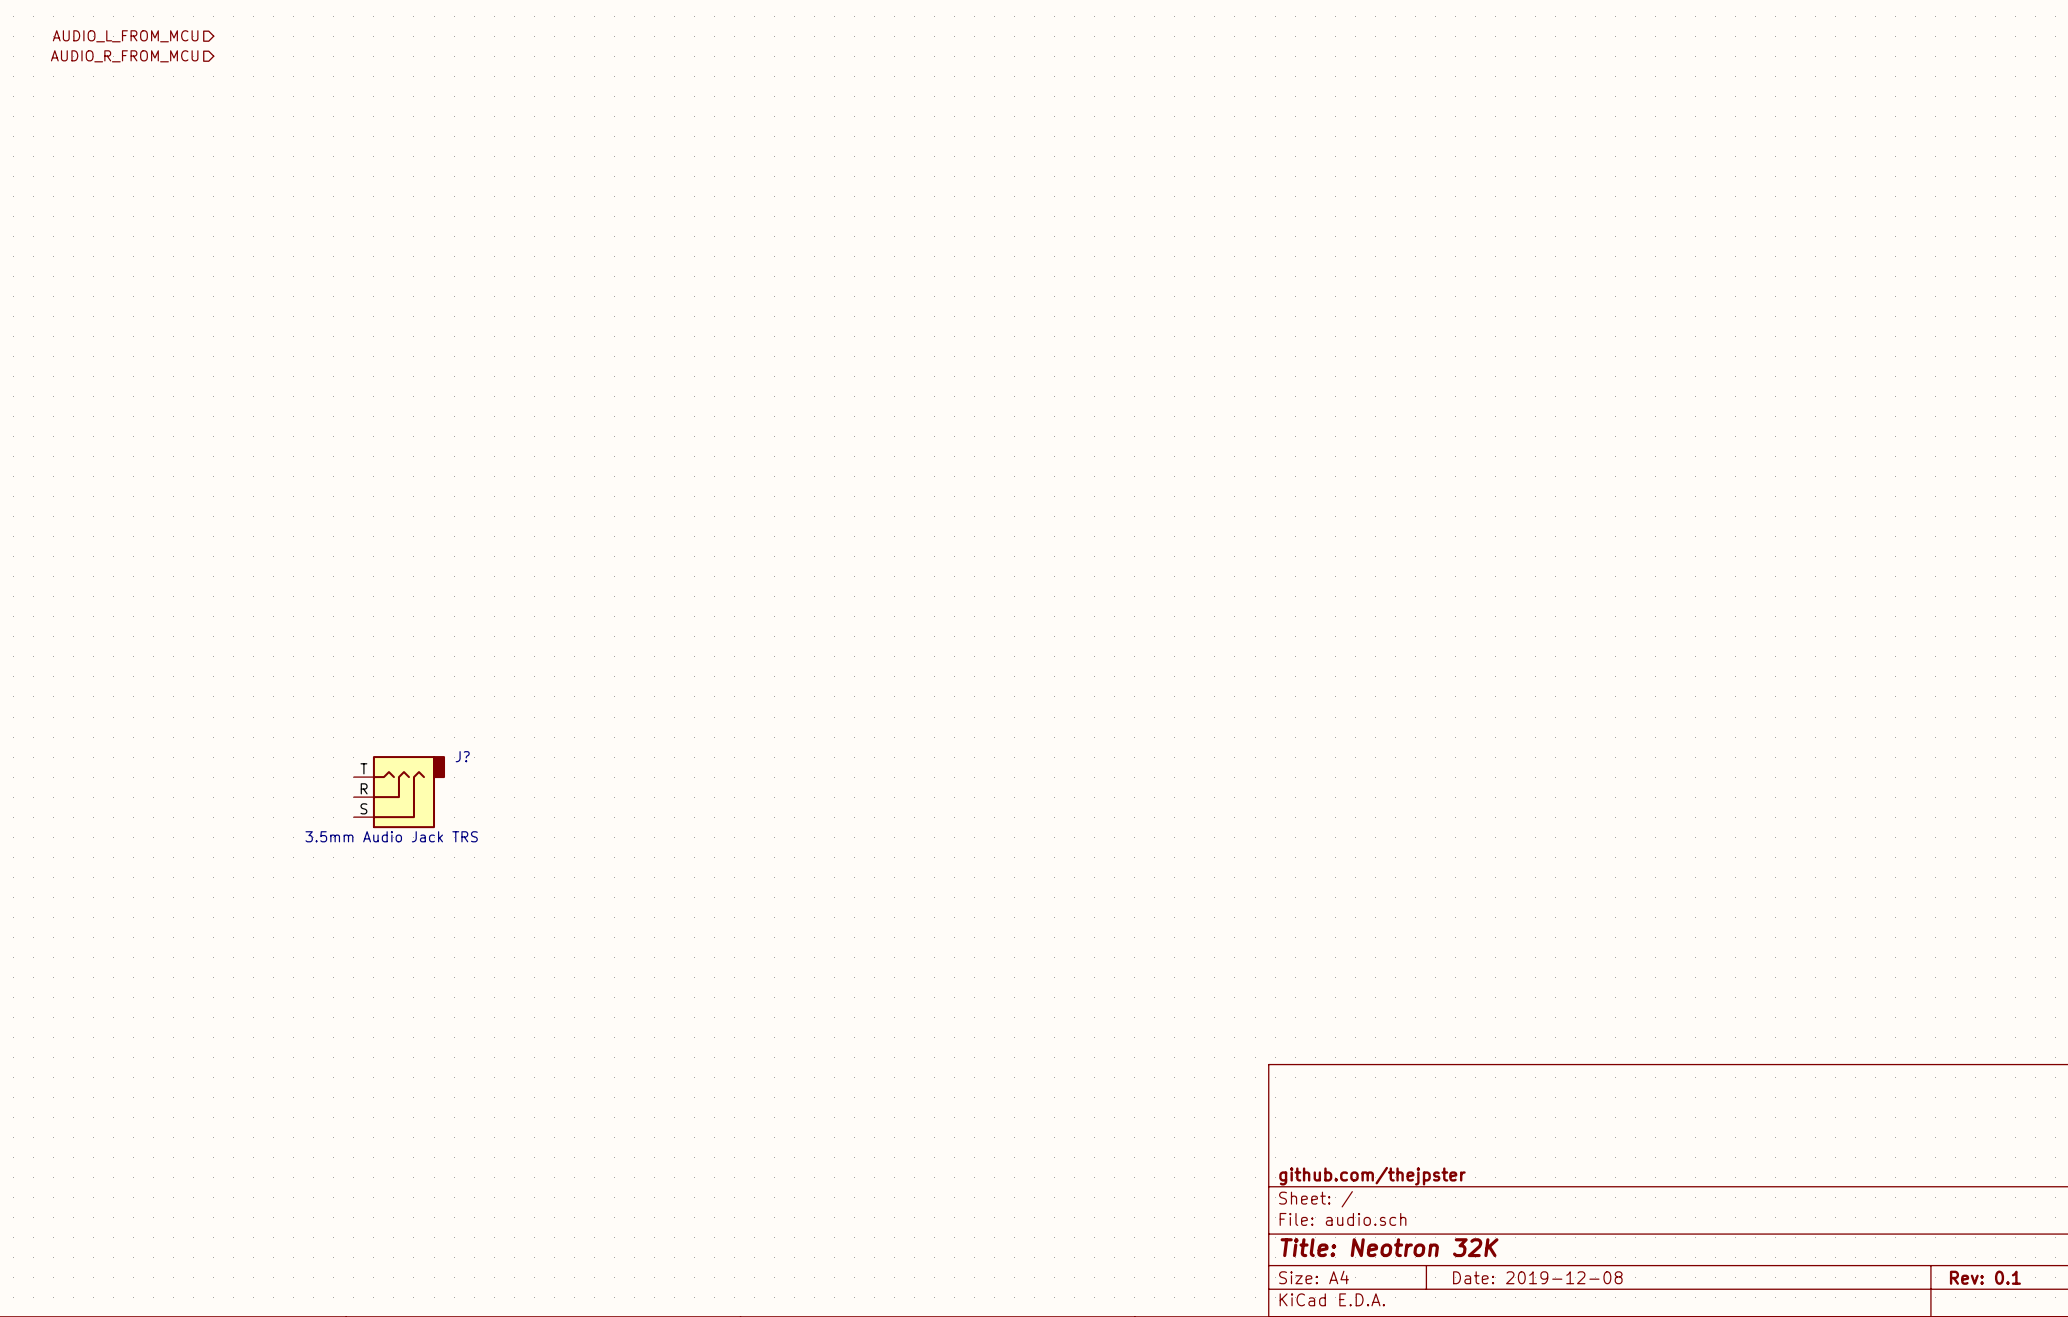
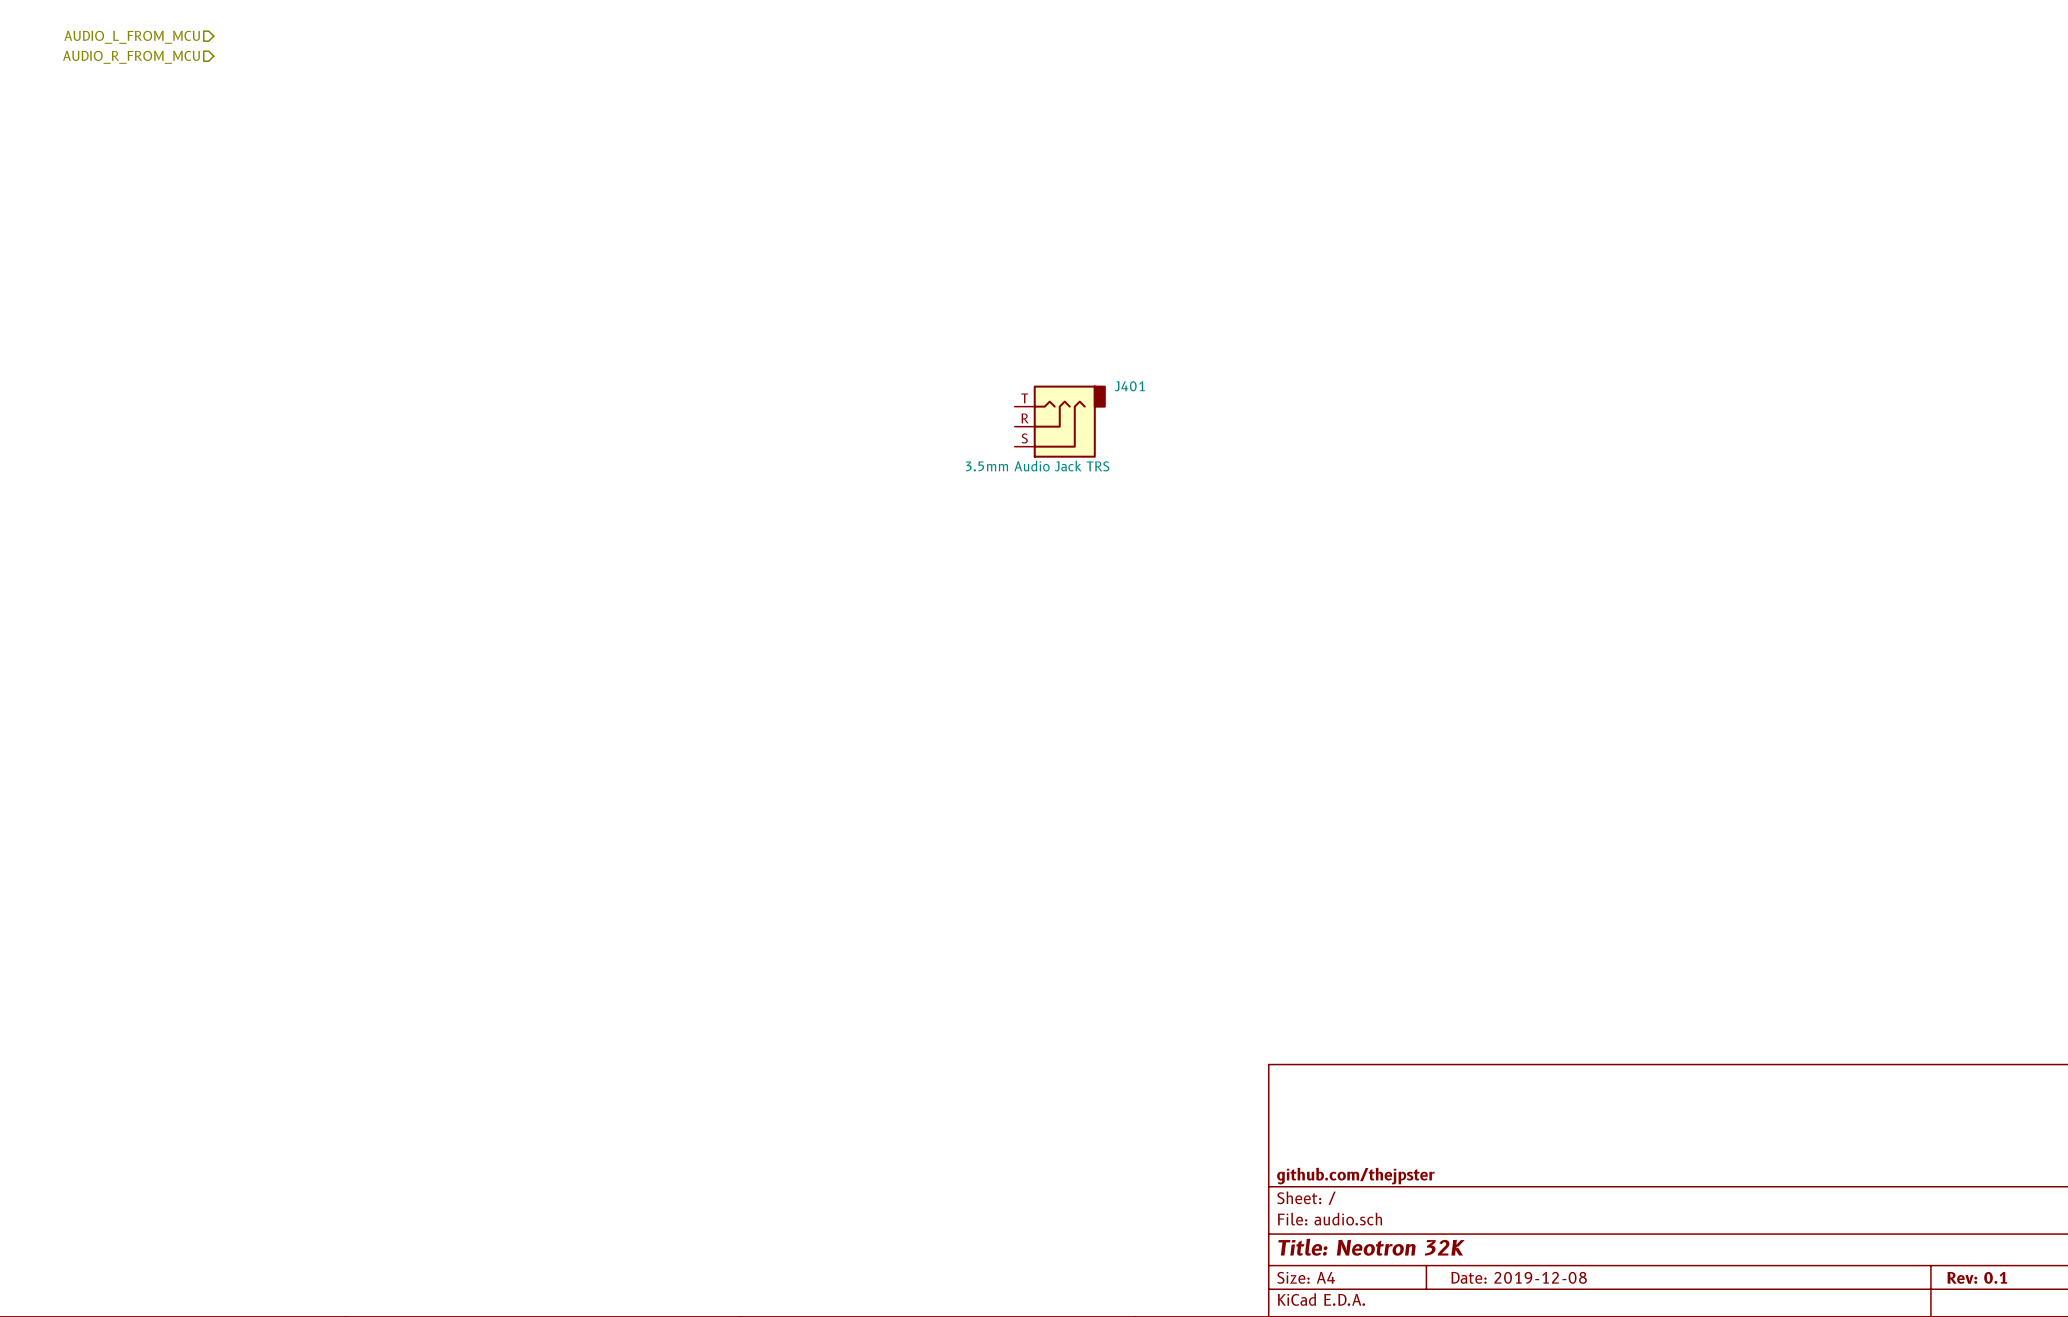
J401: none -> 3.5mm Audio Jack TRS (1060, 421)
J?: 3.5mm Audio Jack TRS (399, 792) -> none

